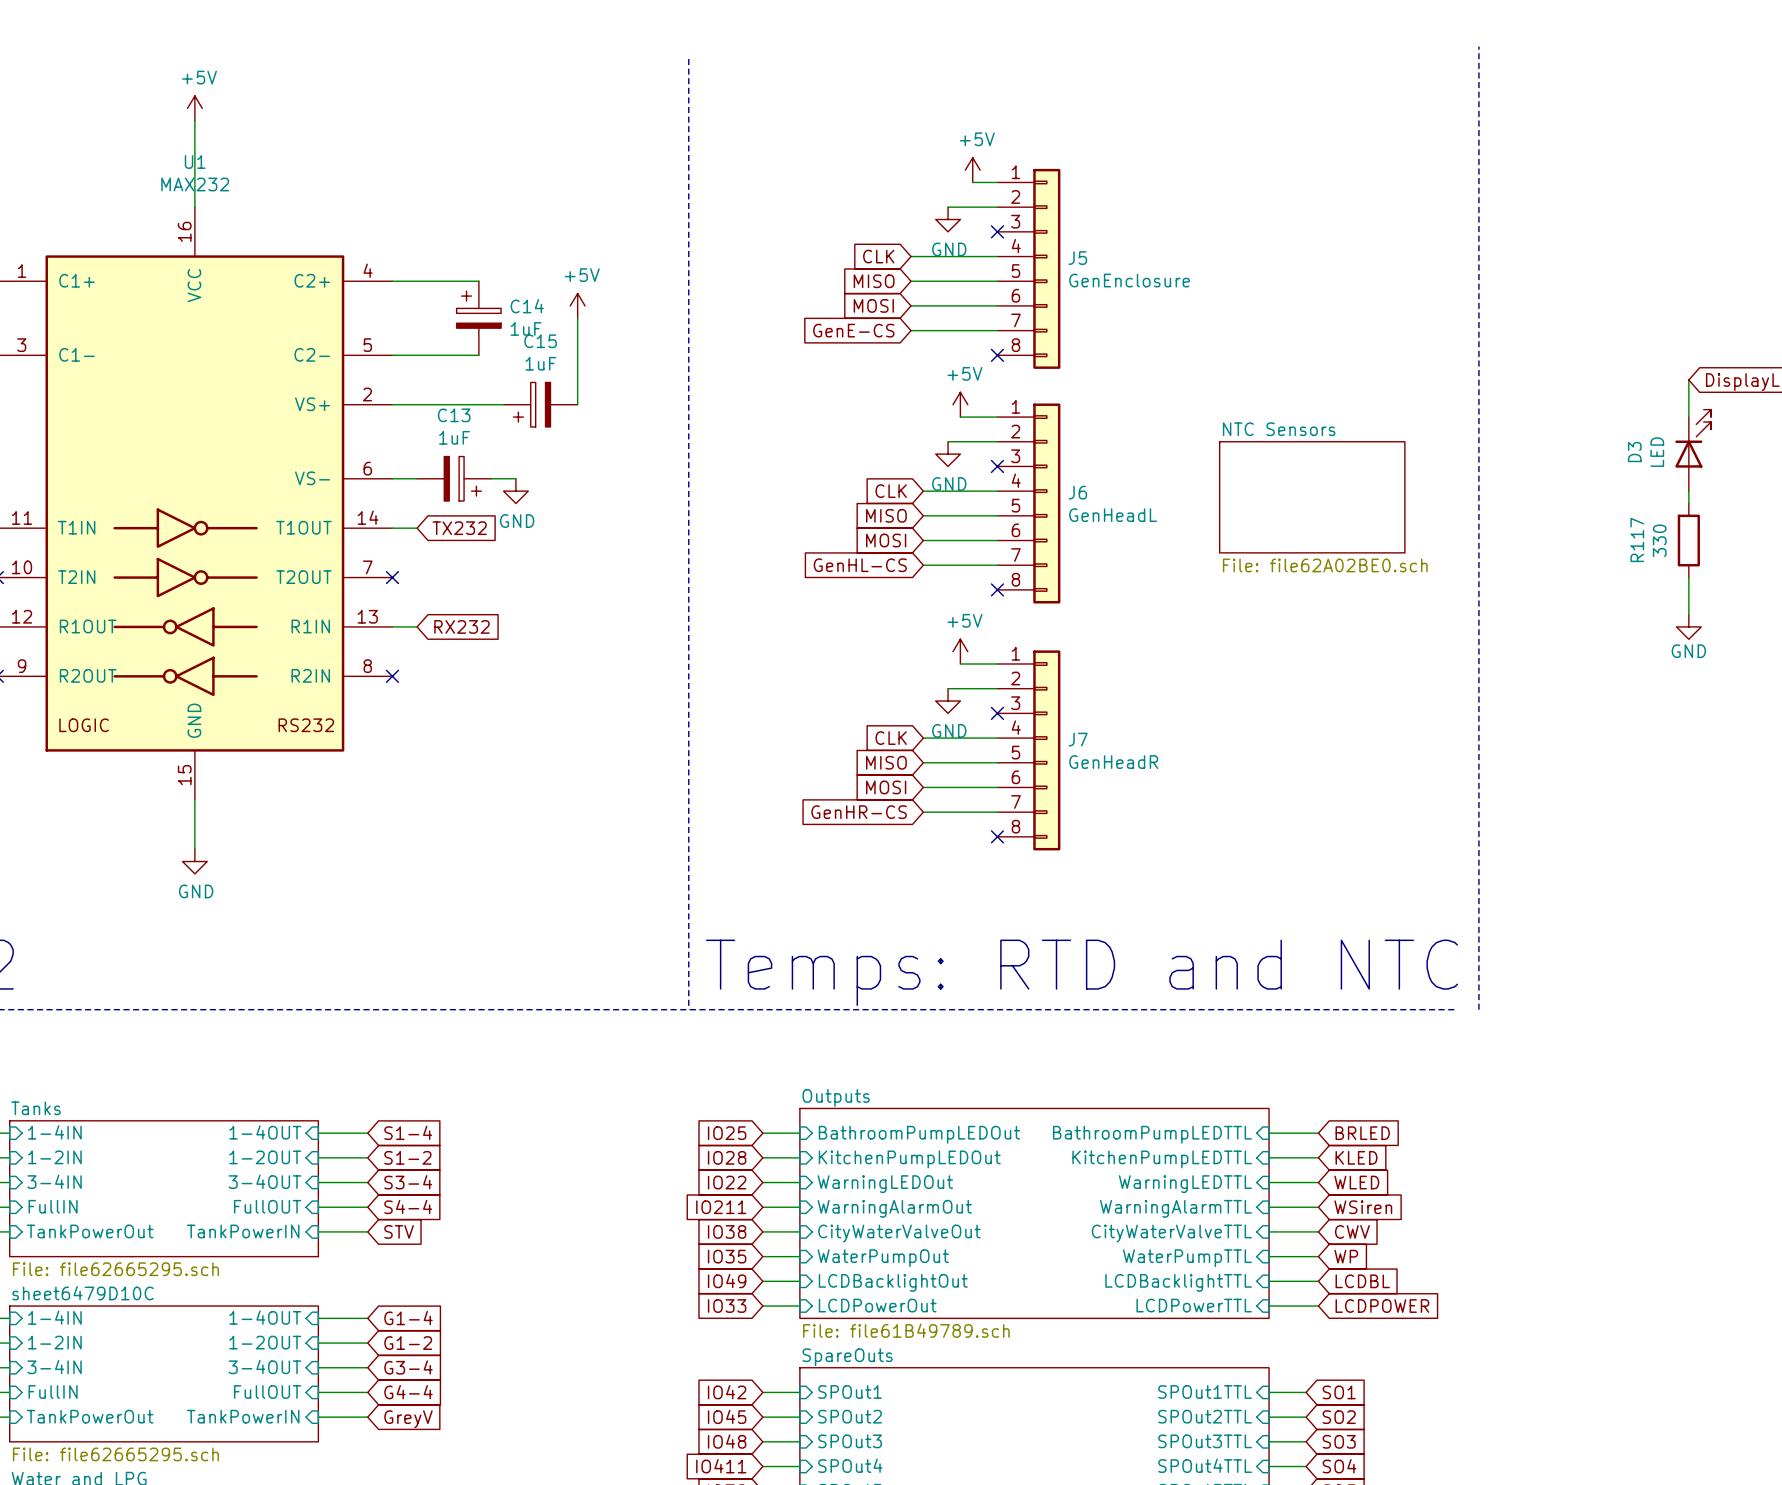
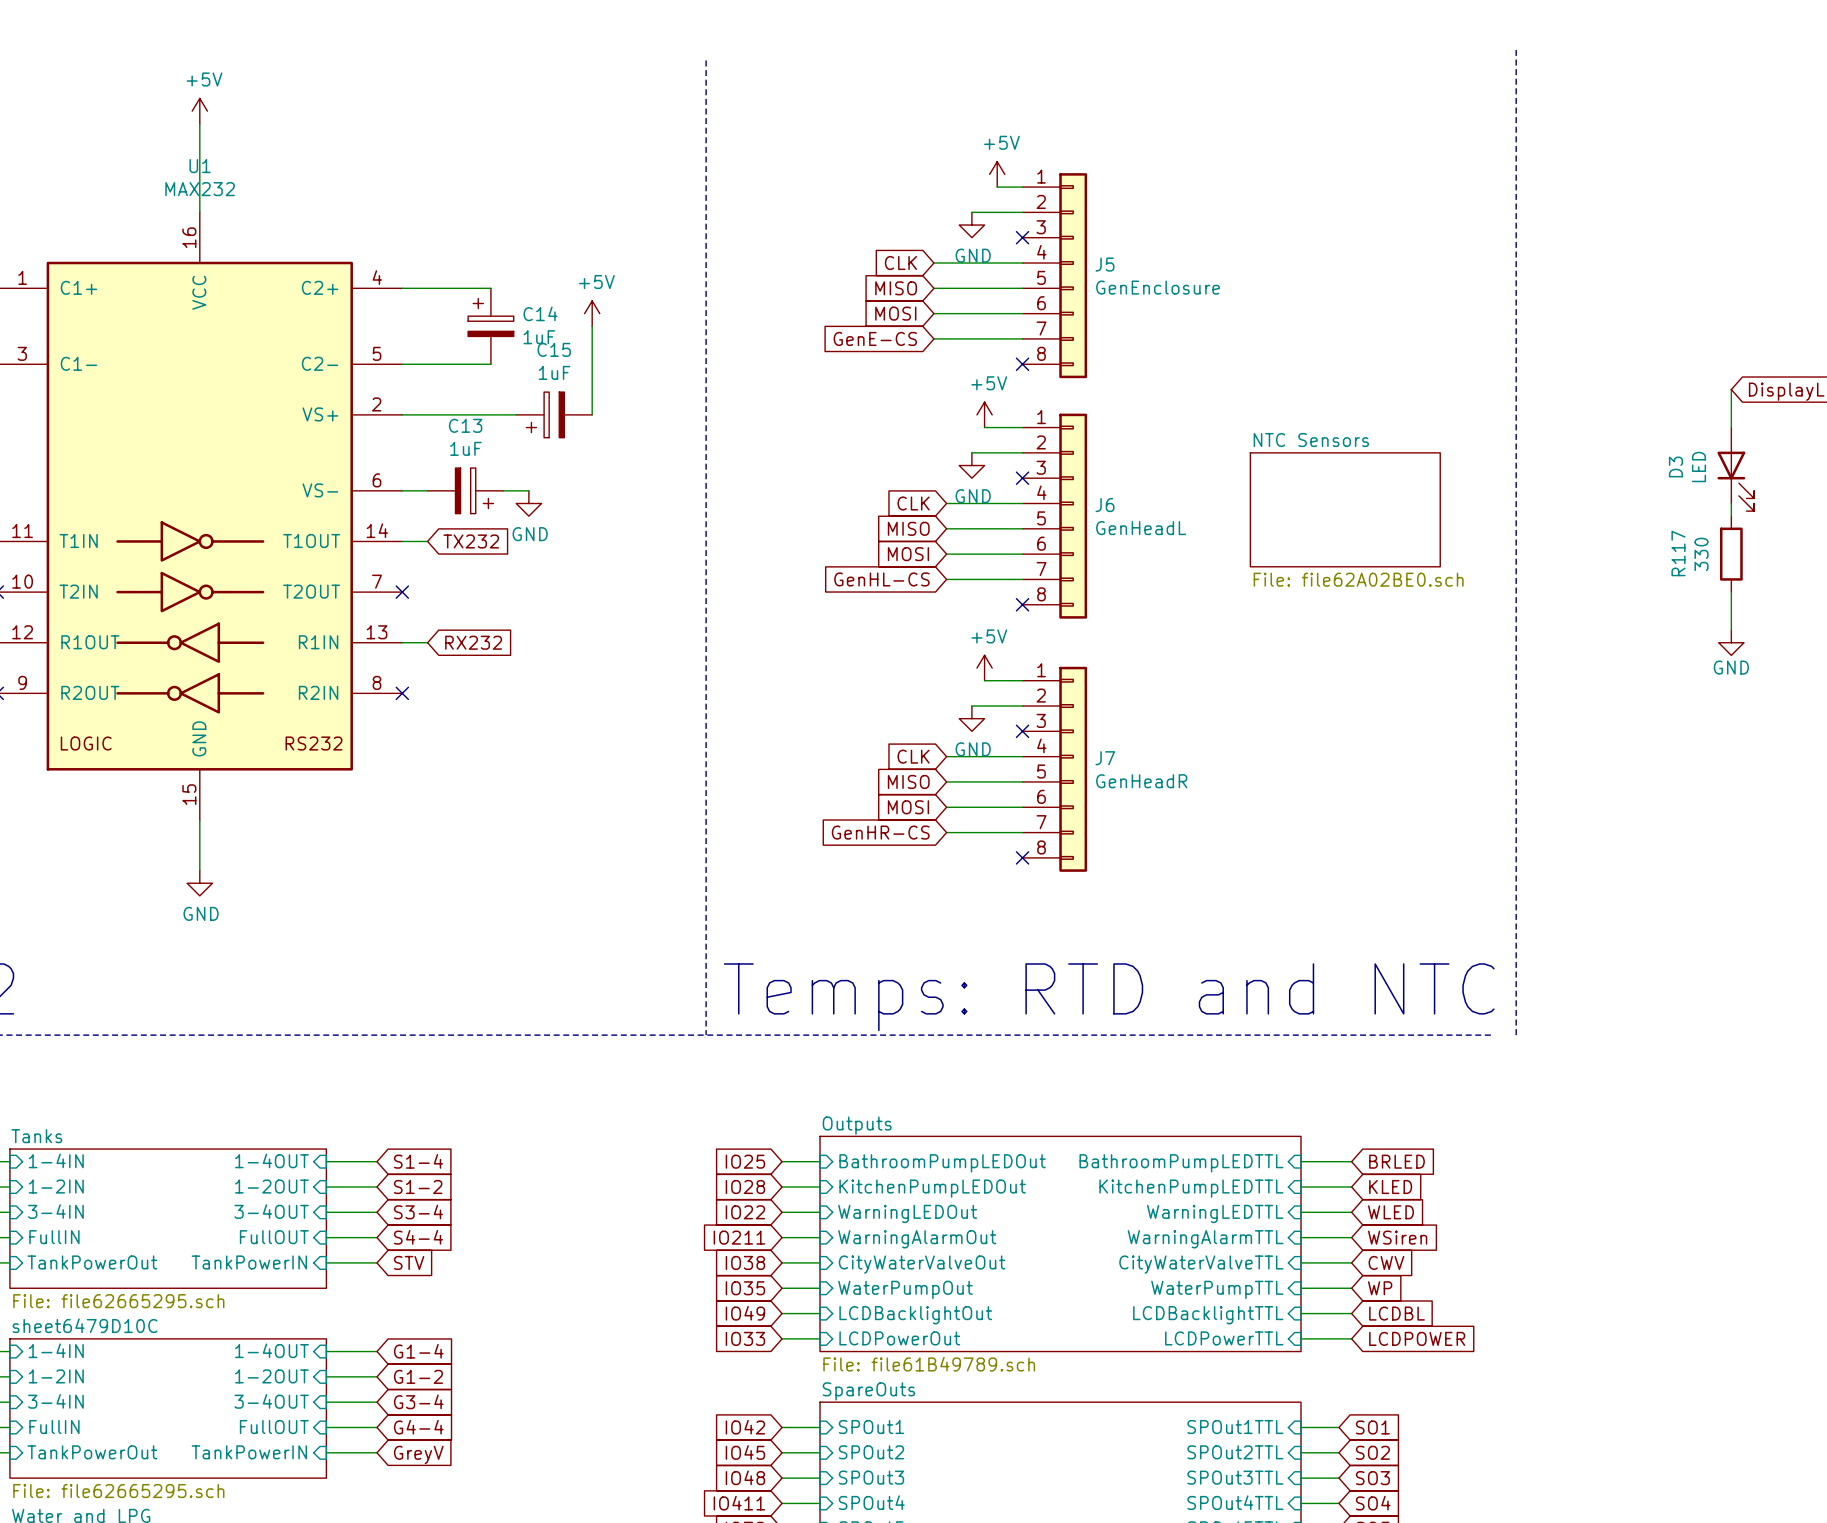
D3 flip: as is (1693, 438) -> up-down (1735, 481)

